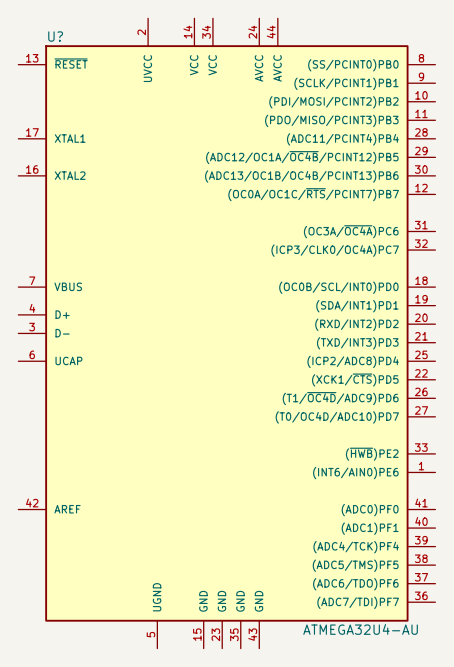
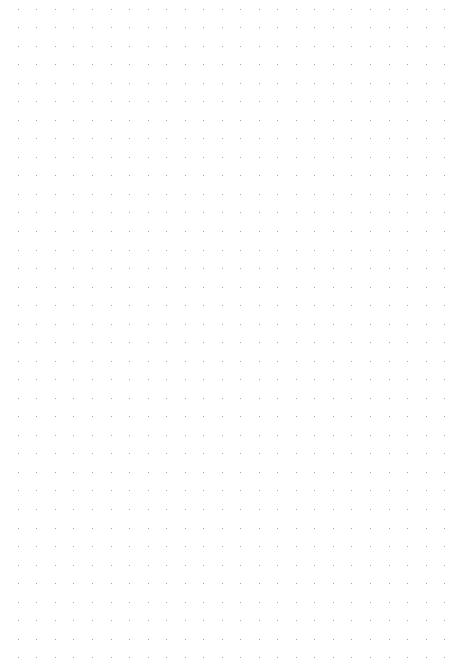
U?: ATMEGA32U4-AU (226, 333) -> none

